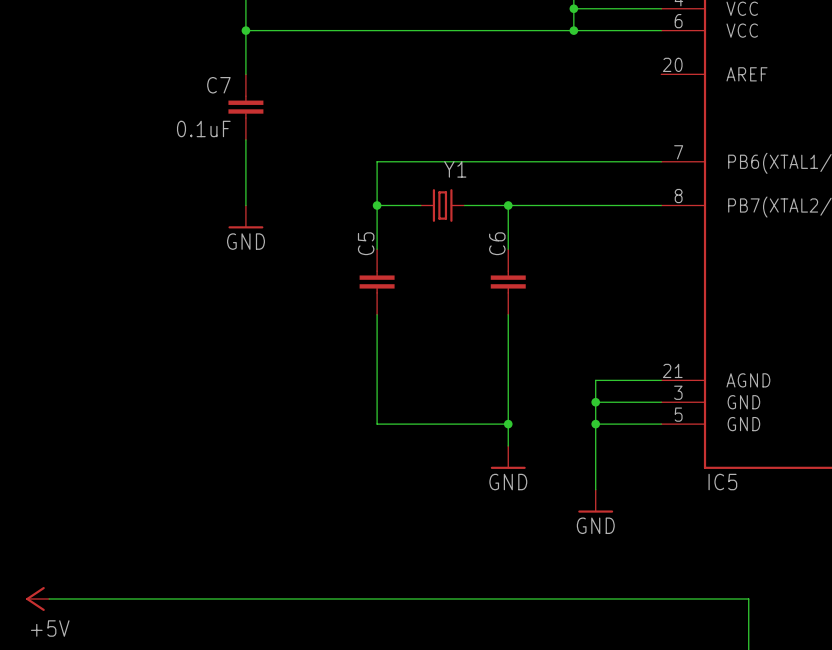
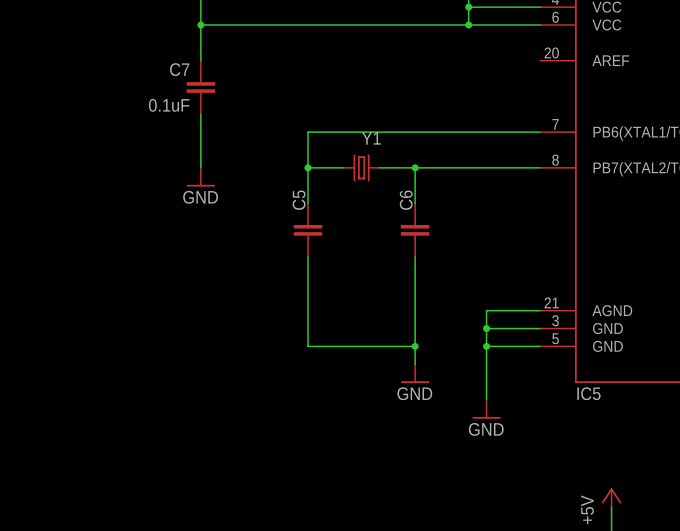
power symbol: +5V (37, 598) -> none
wire: (49, 598) (748, 598) (748, 620) -> none
power symbol: none -> +5V (611, 497)

